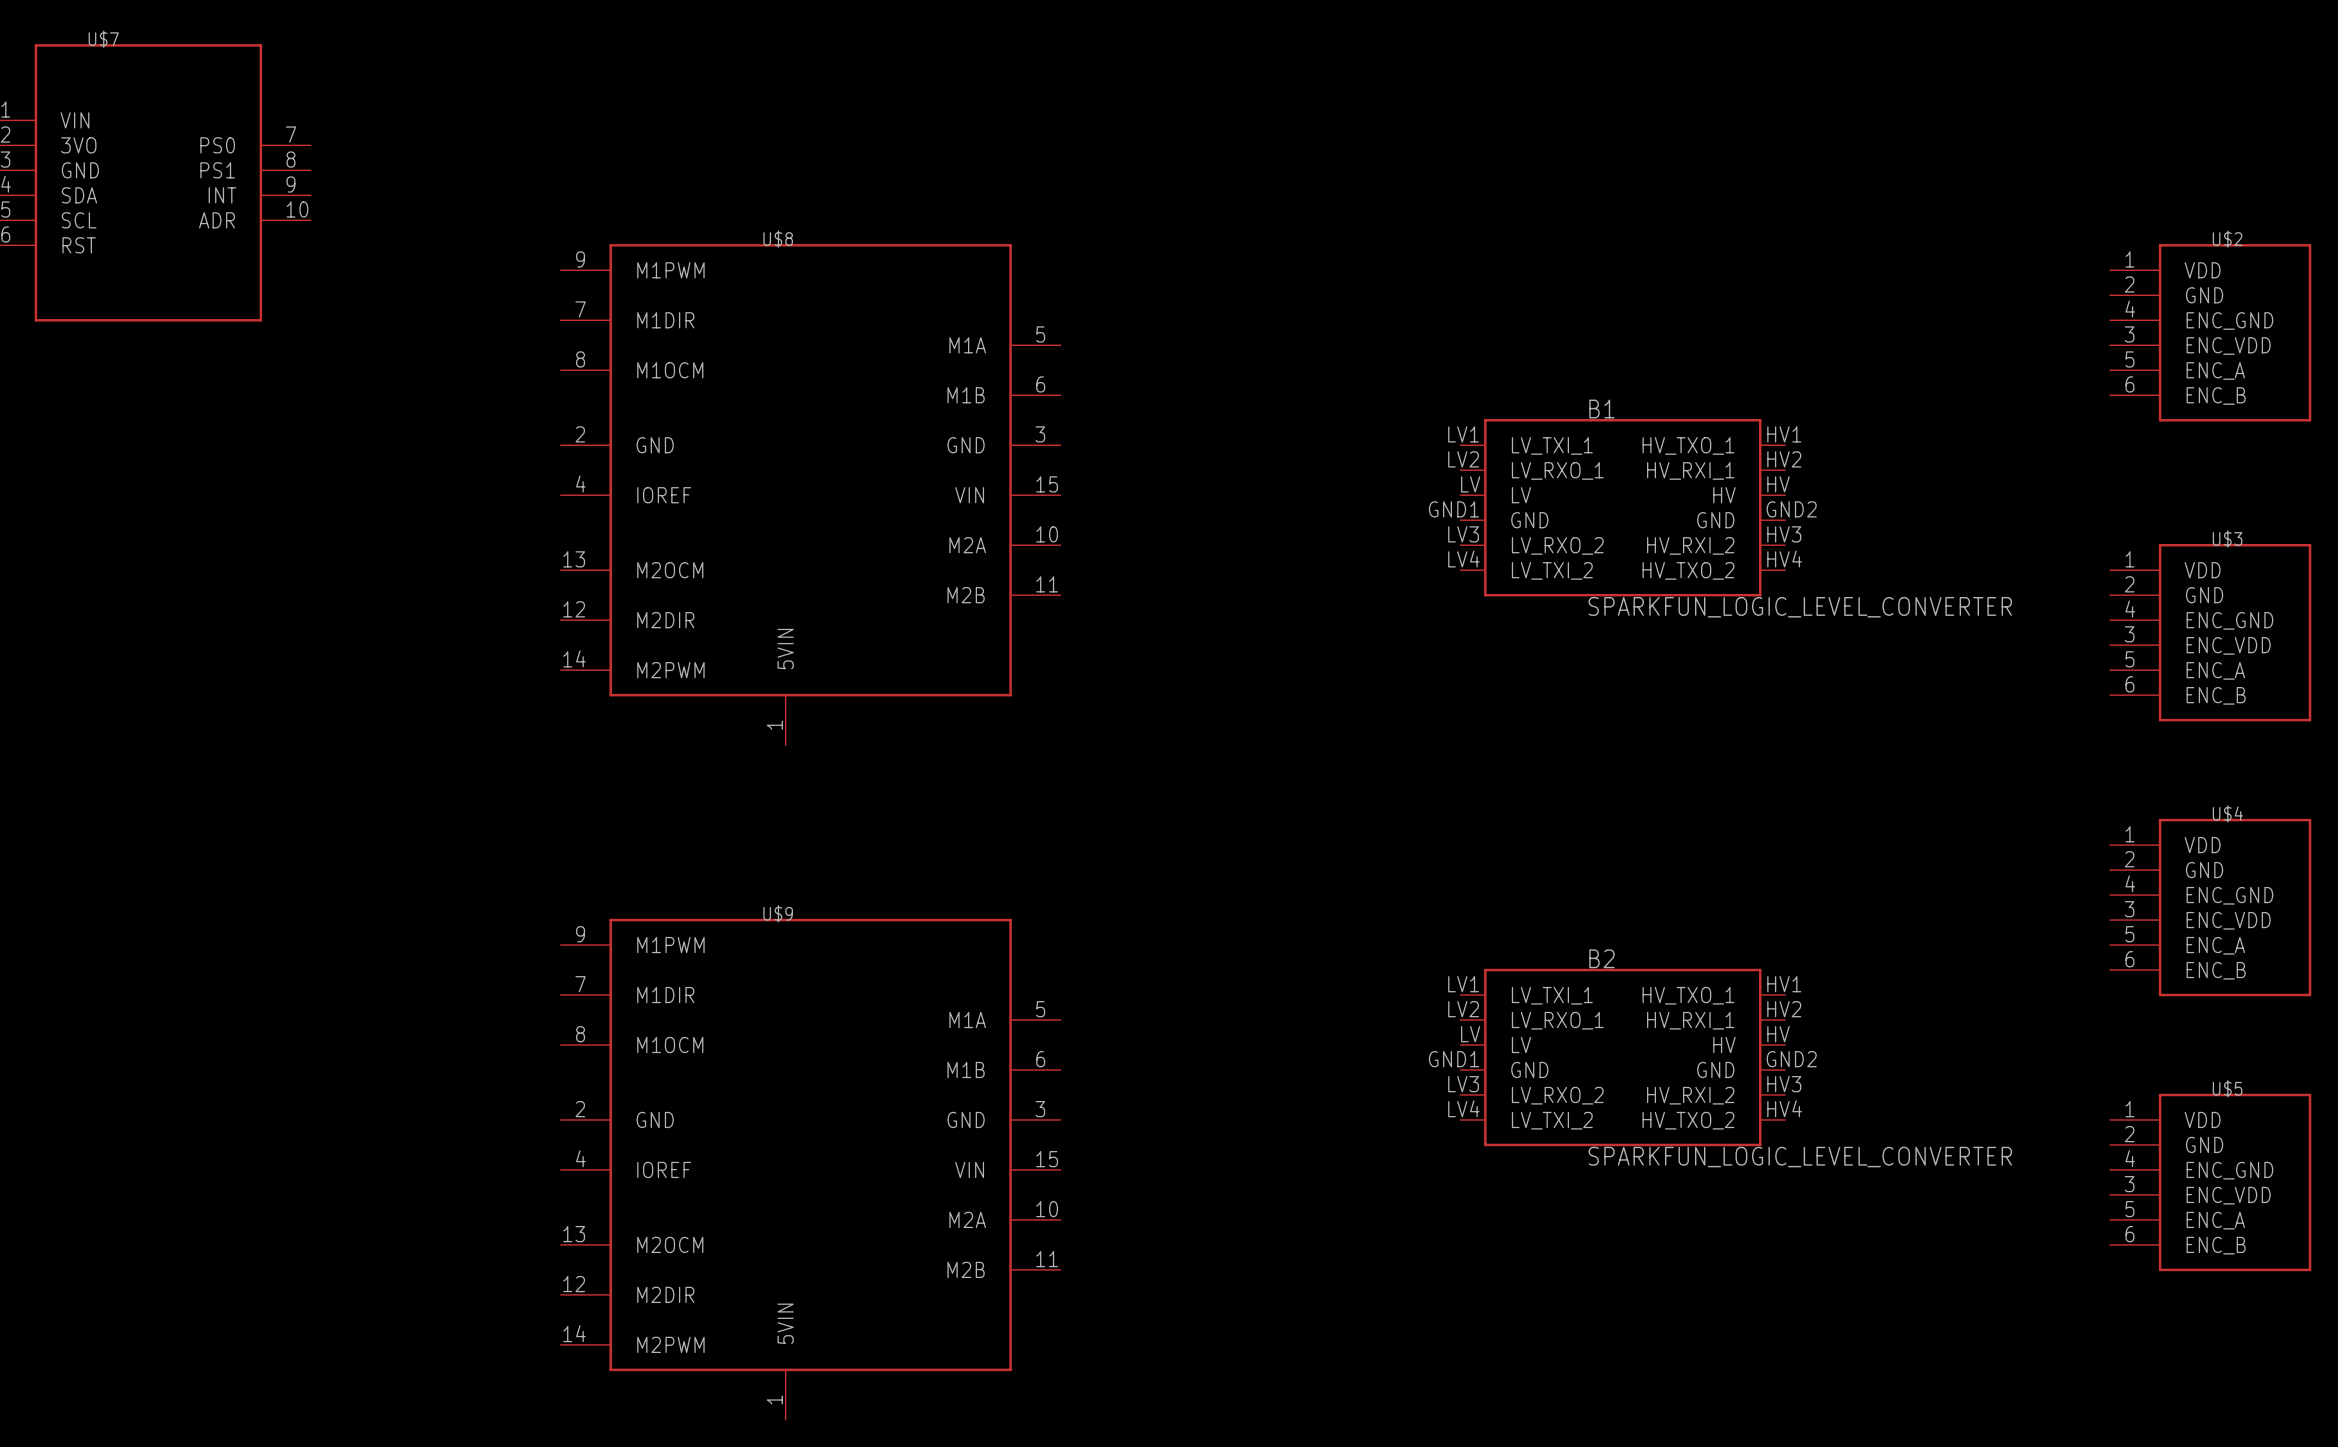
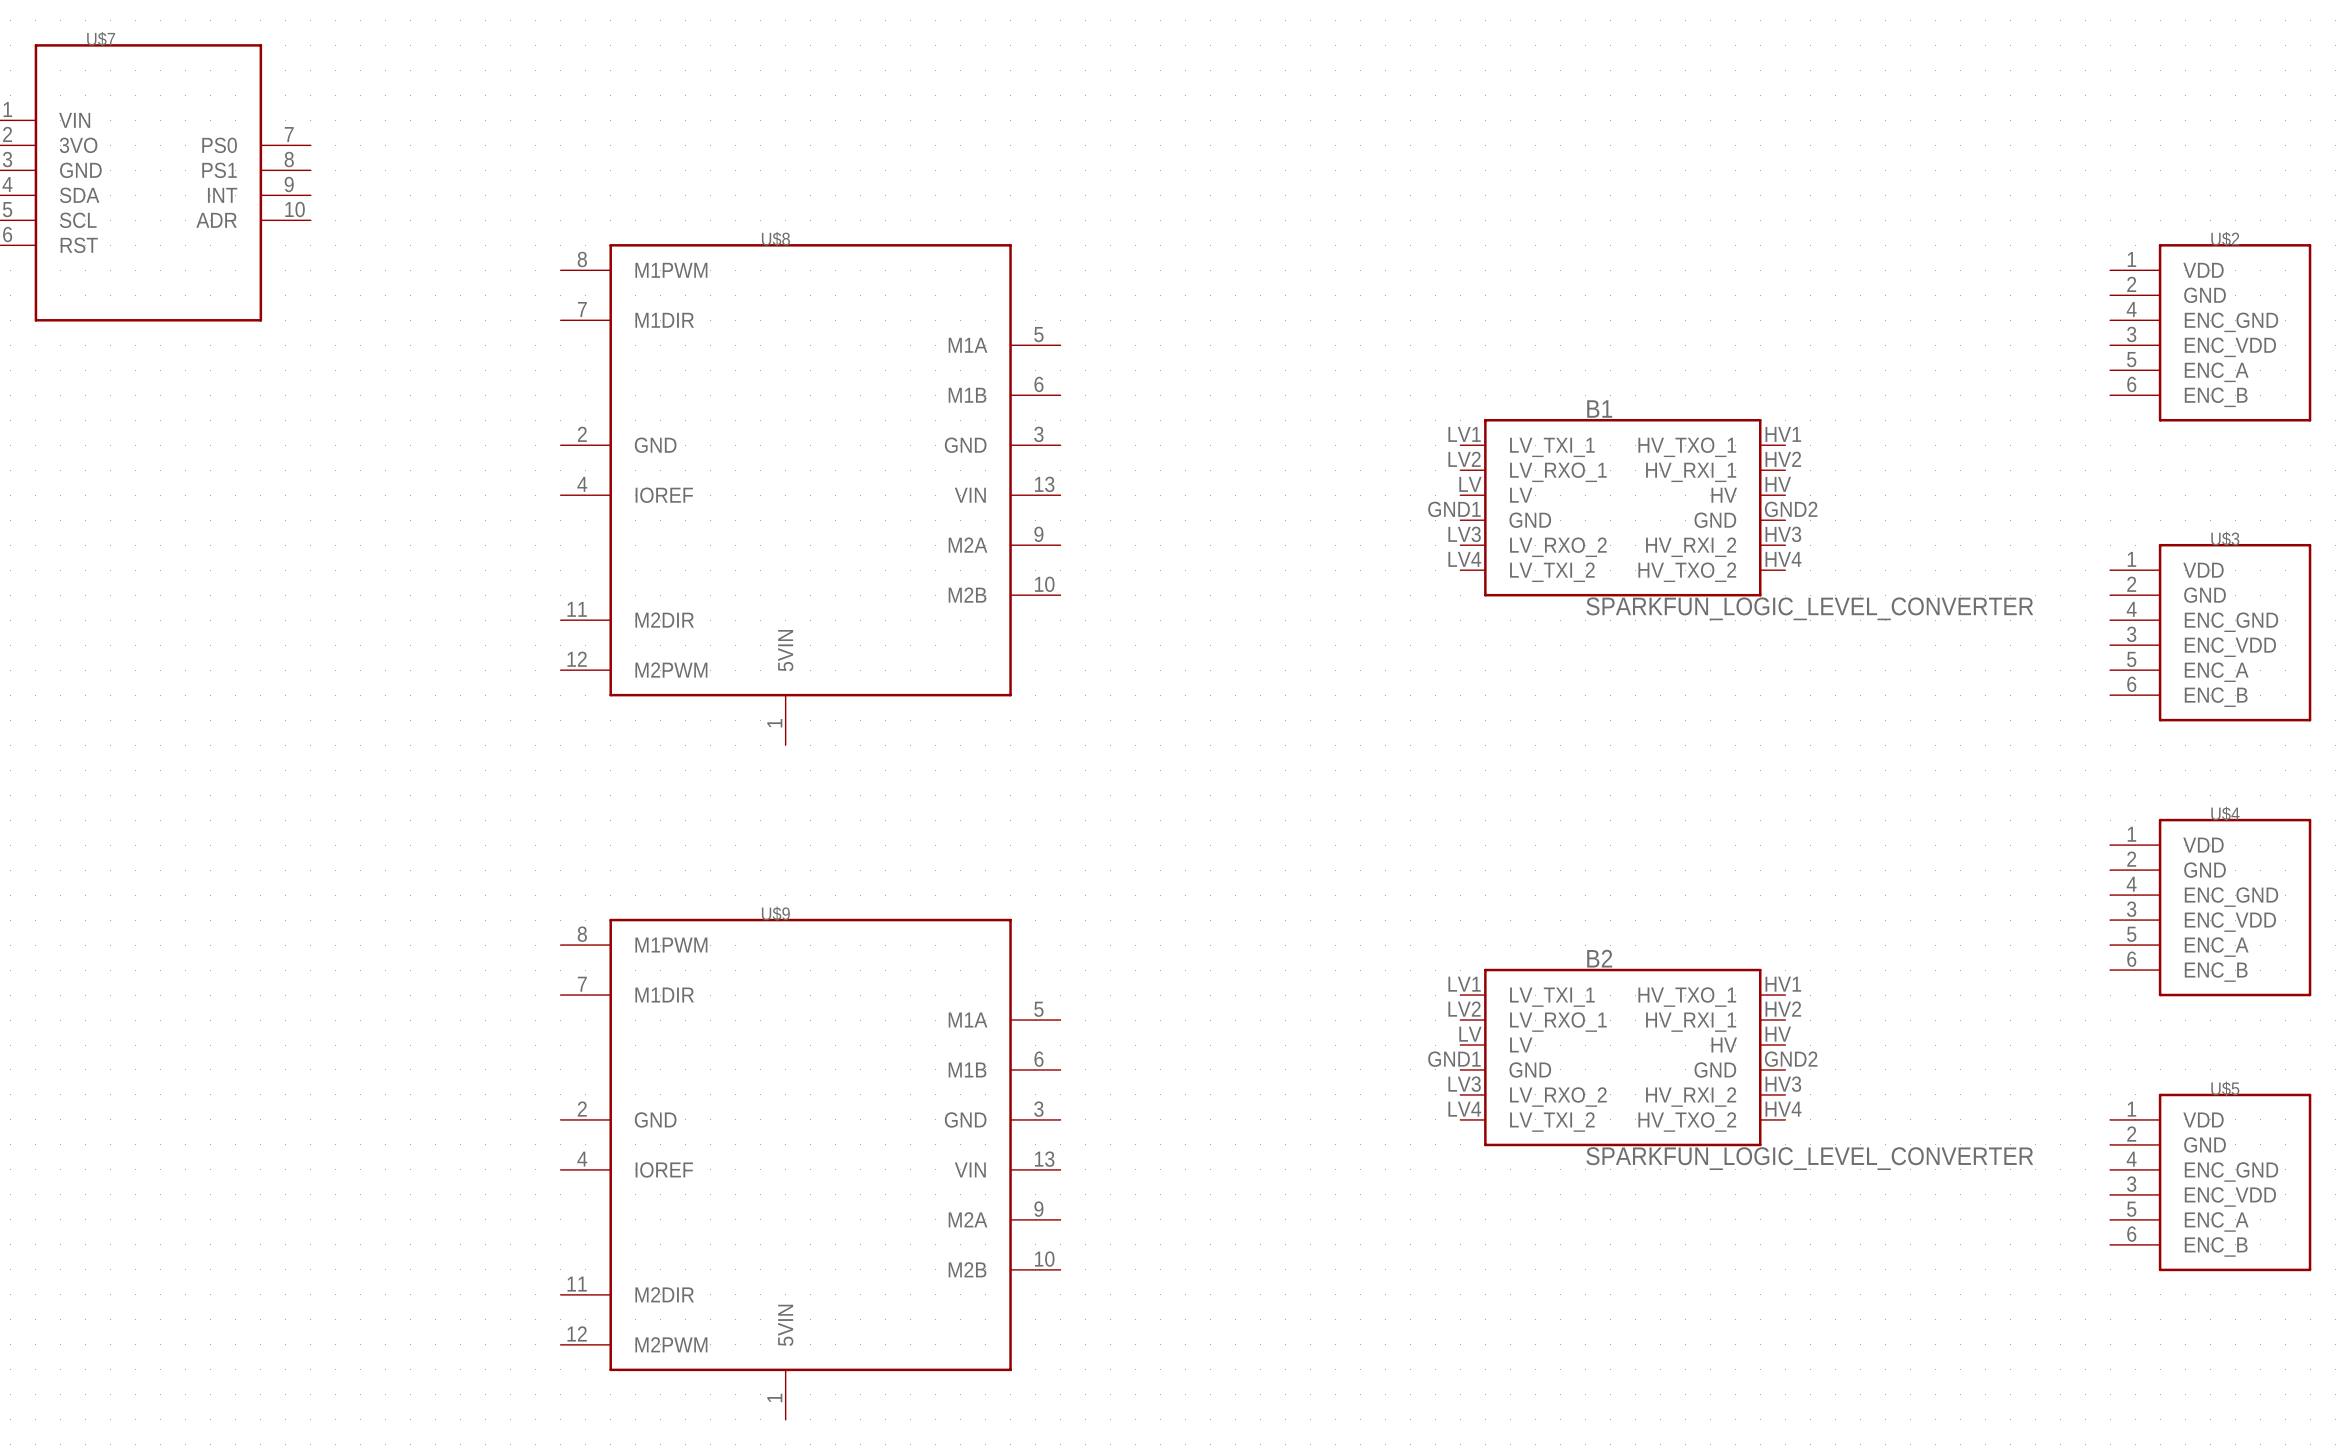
U$8 symbol: [560, 244, 1061, 746] -> [560, 244, 1061, 746]
U$9 symbol: [560, 918, 1061, 1420] -> [560, 918, 1061, 1420]

